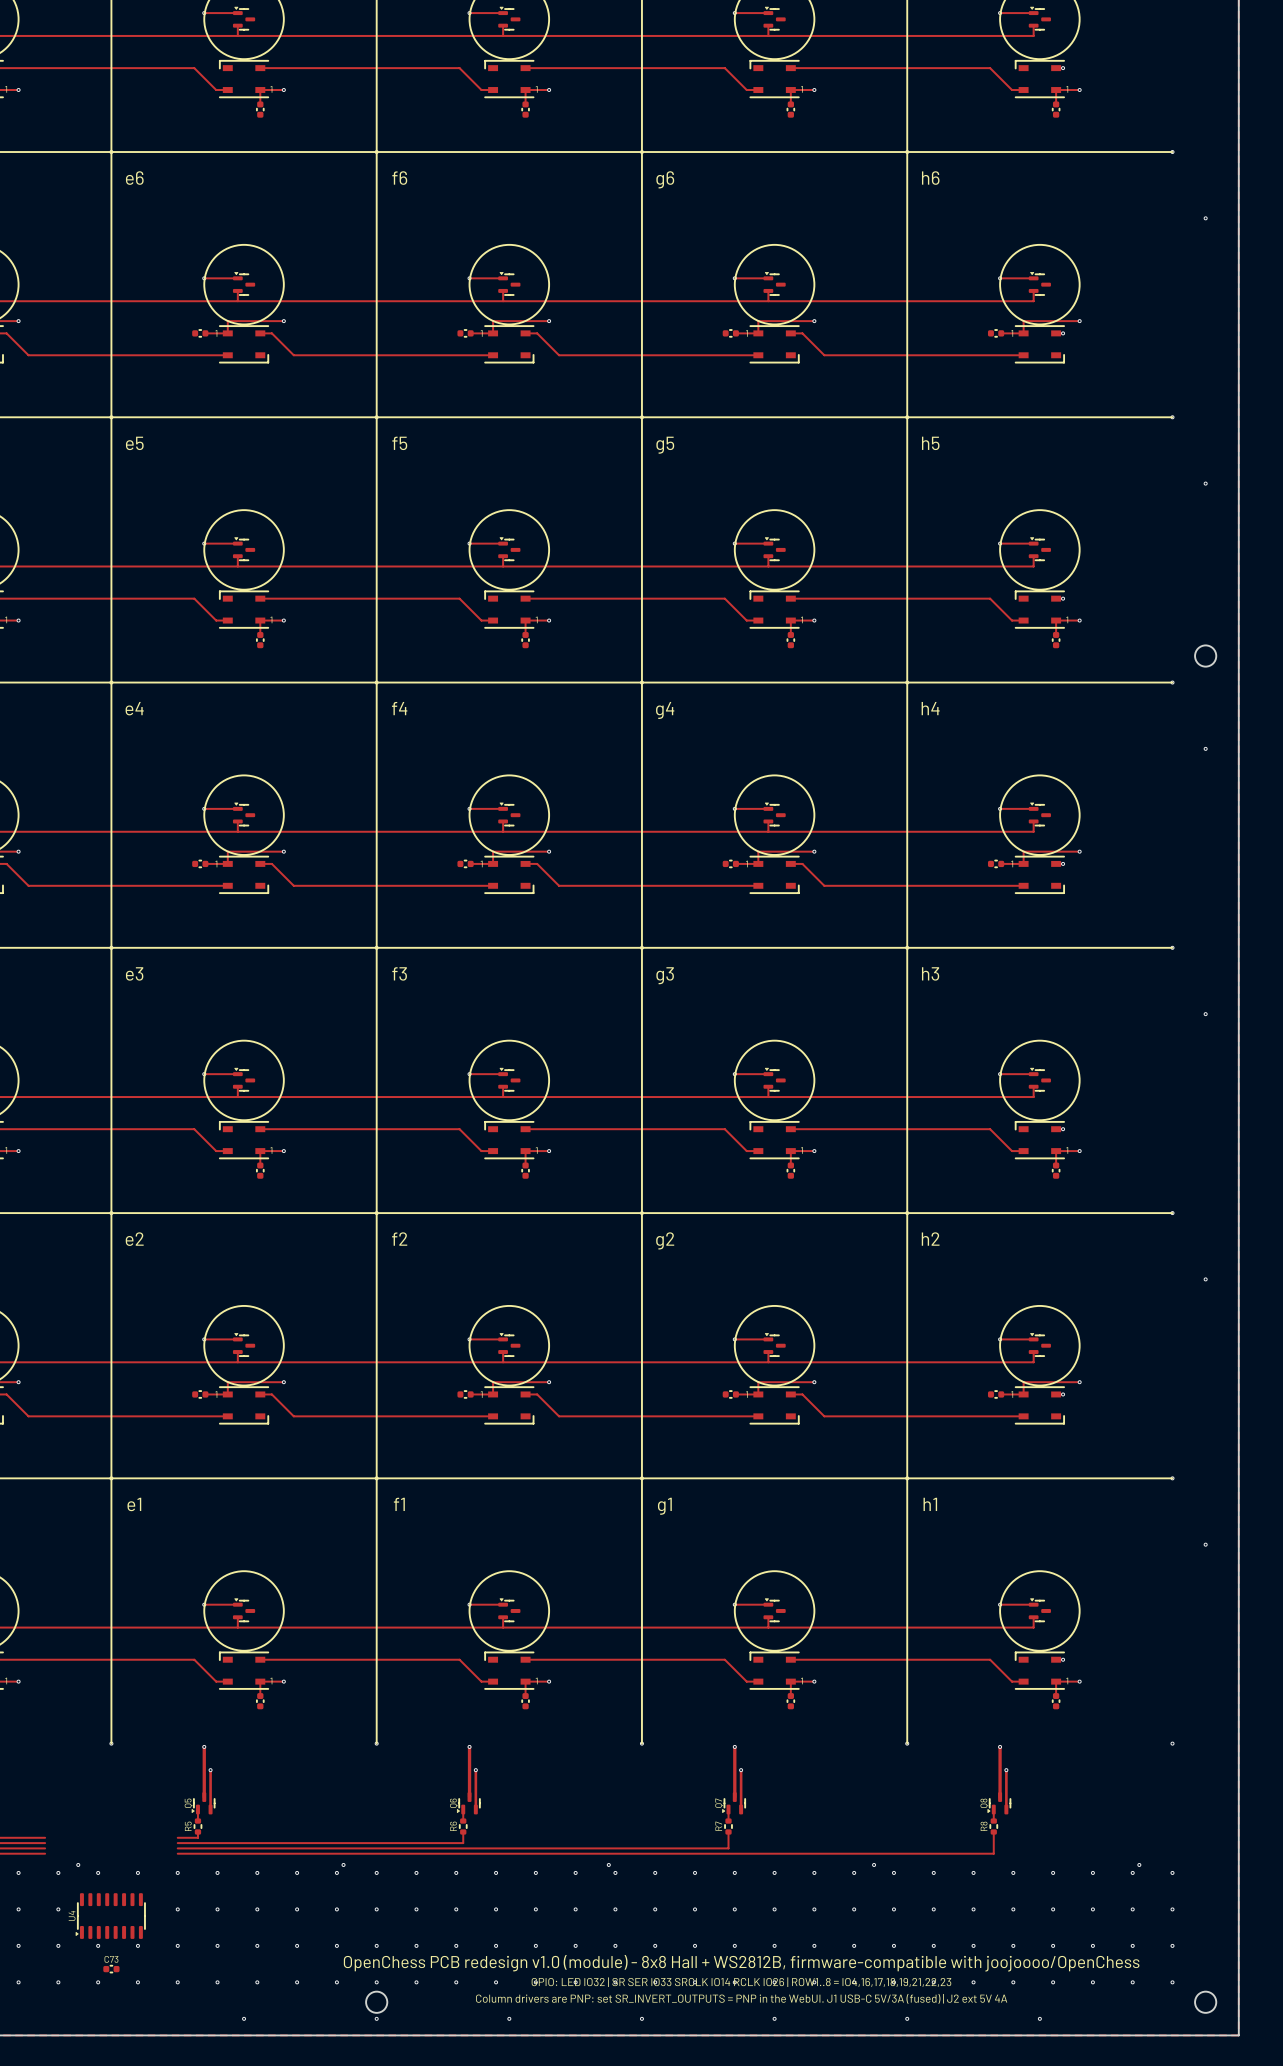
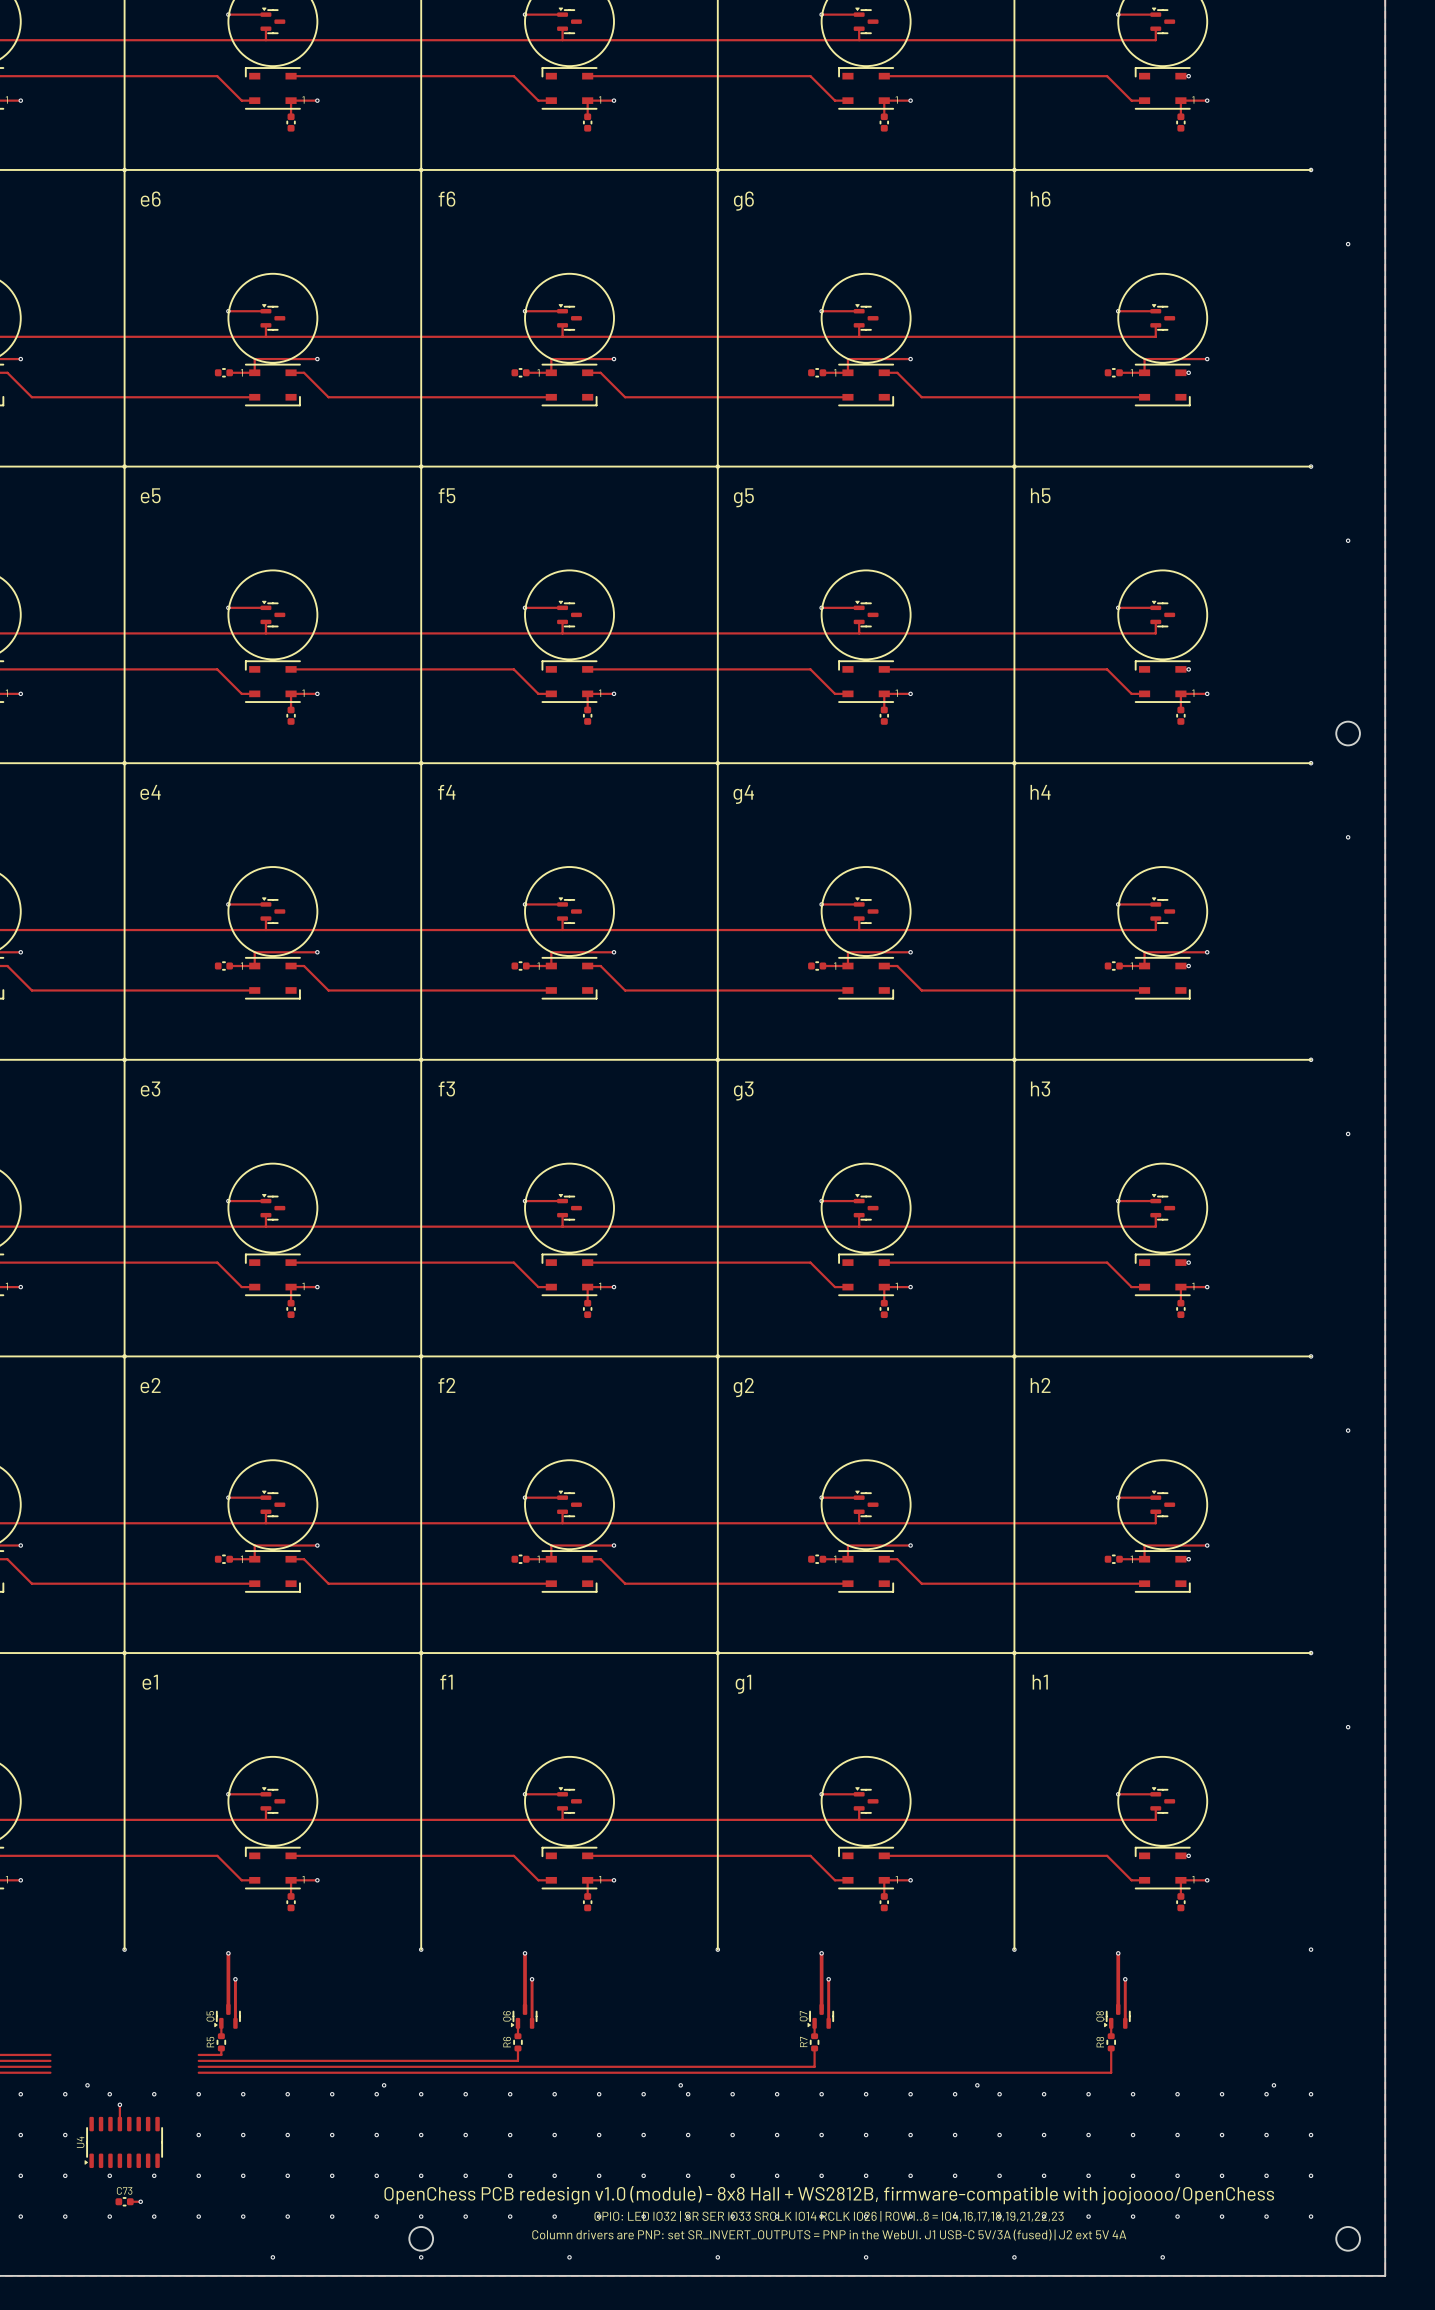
track: none -> (119, 2104) (119, 2124)
via: none -> (119, 2104)
track: none -> (130, 2201) (140, 2201)
via: none -> (140, 2201)

